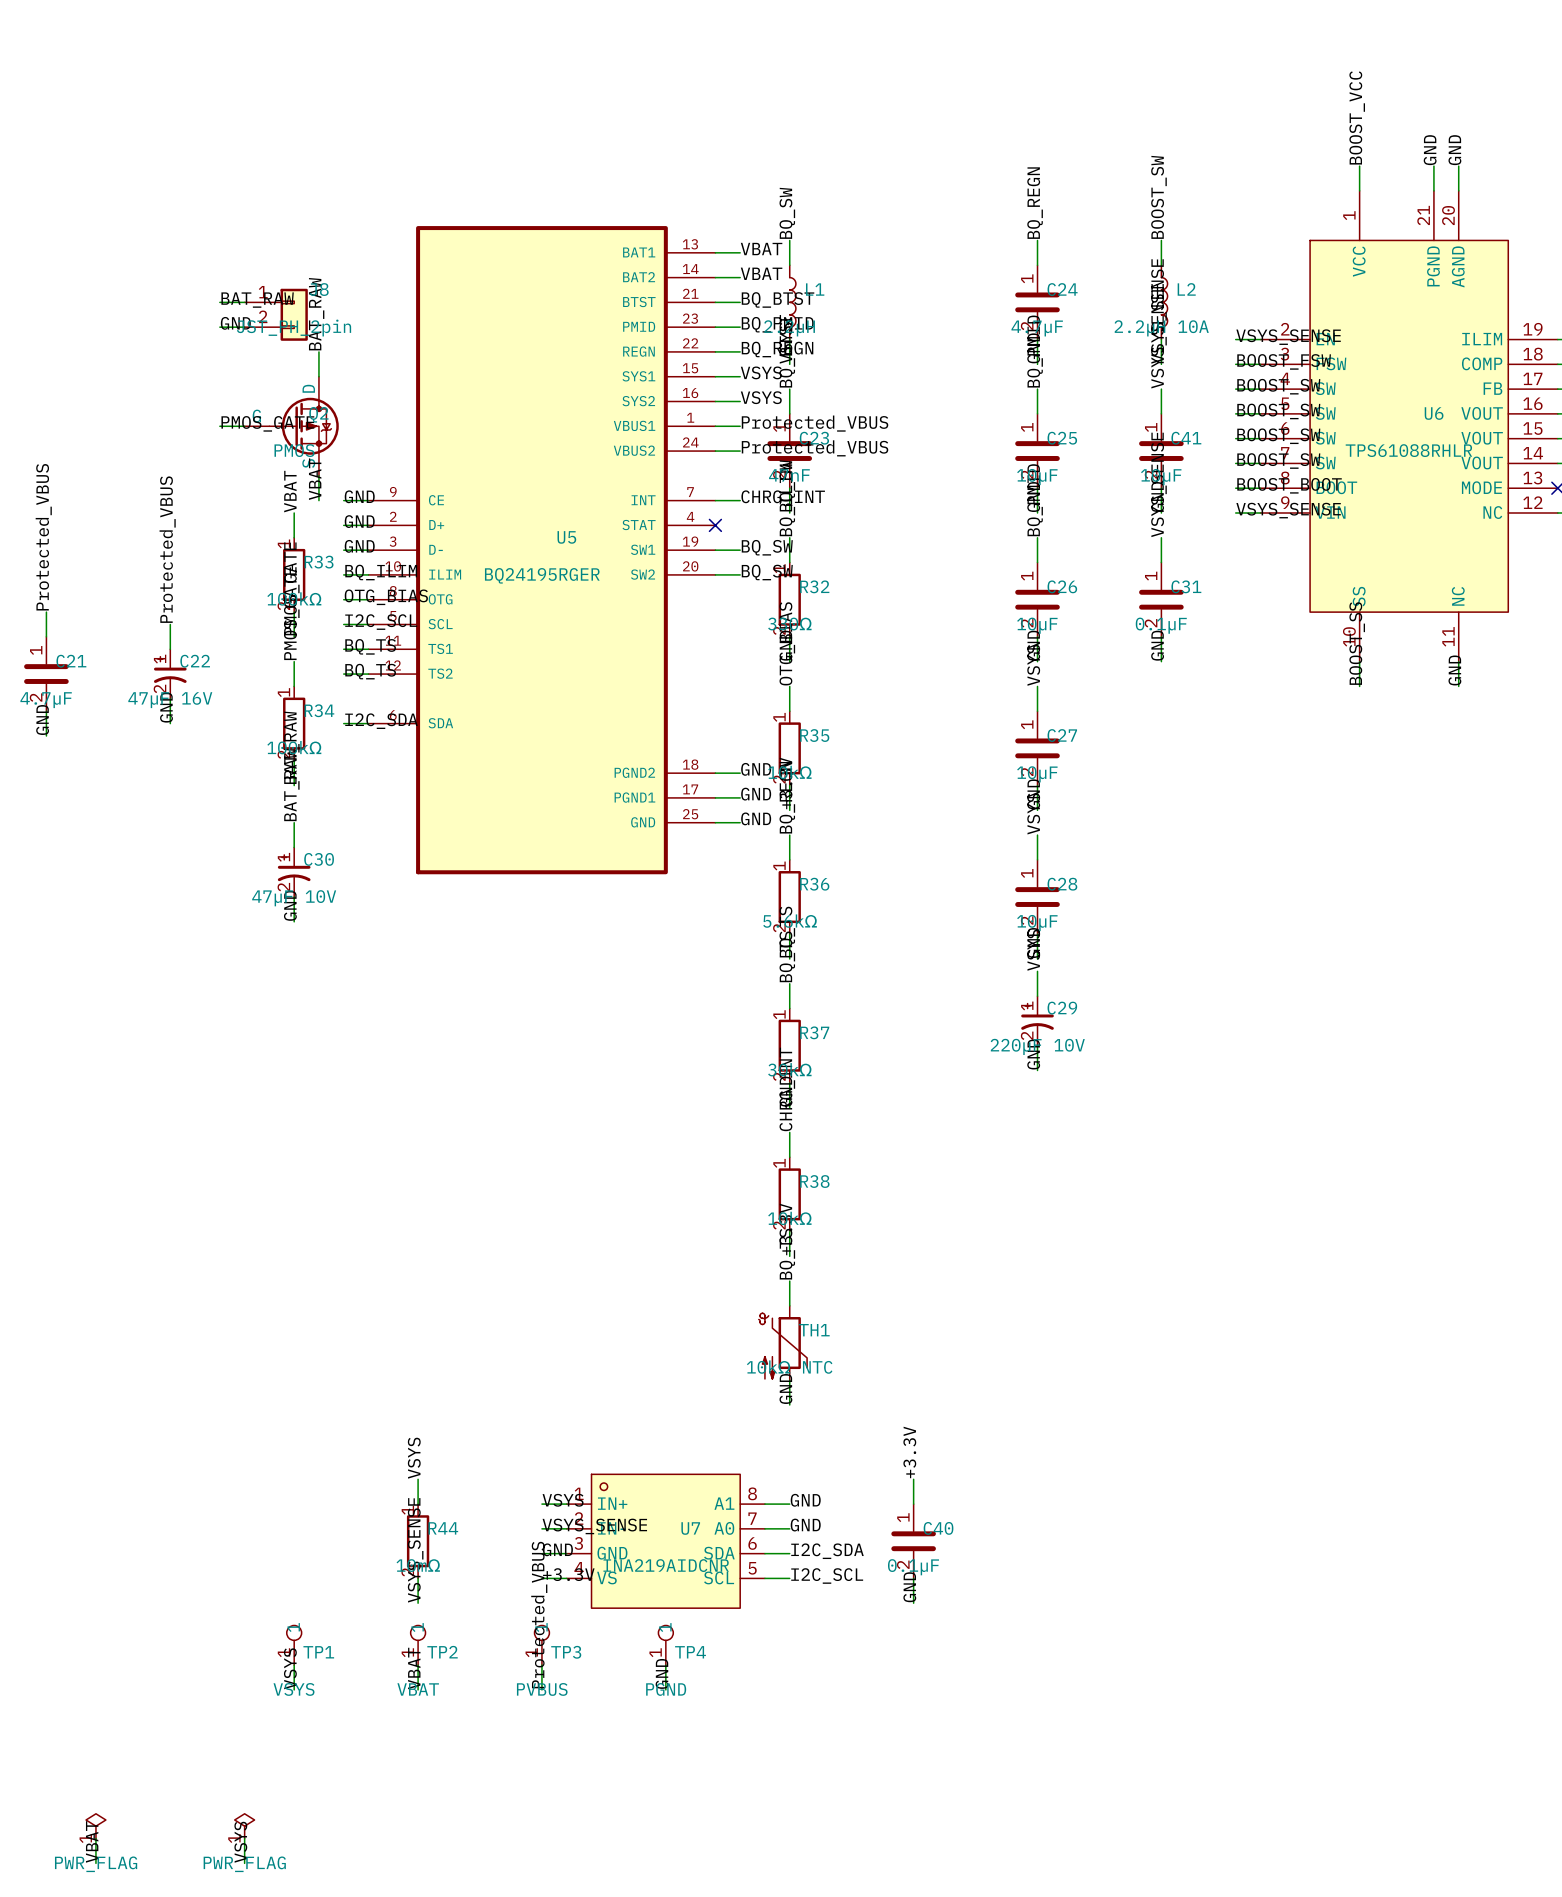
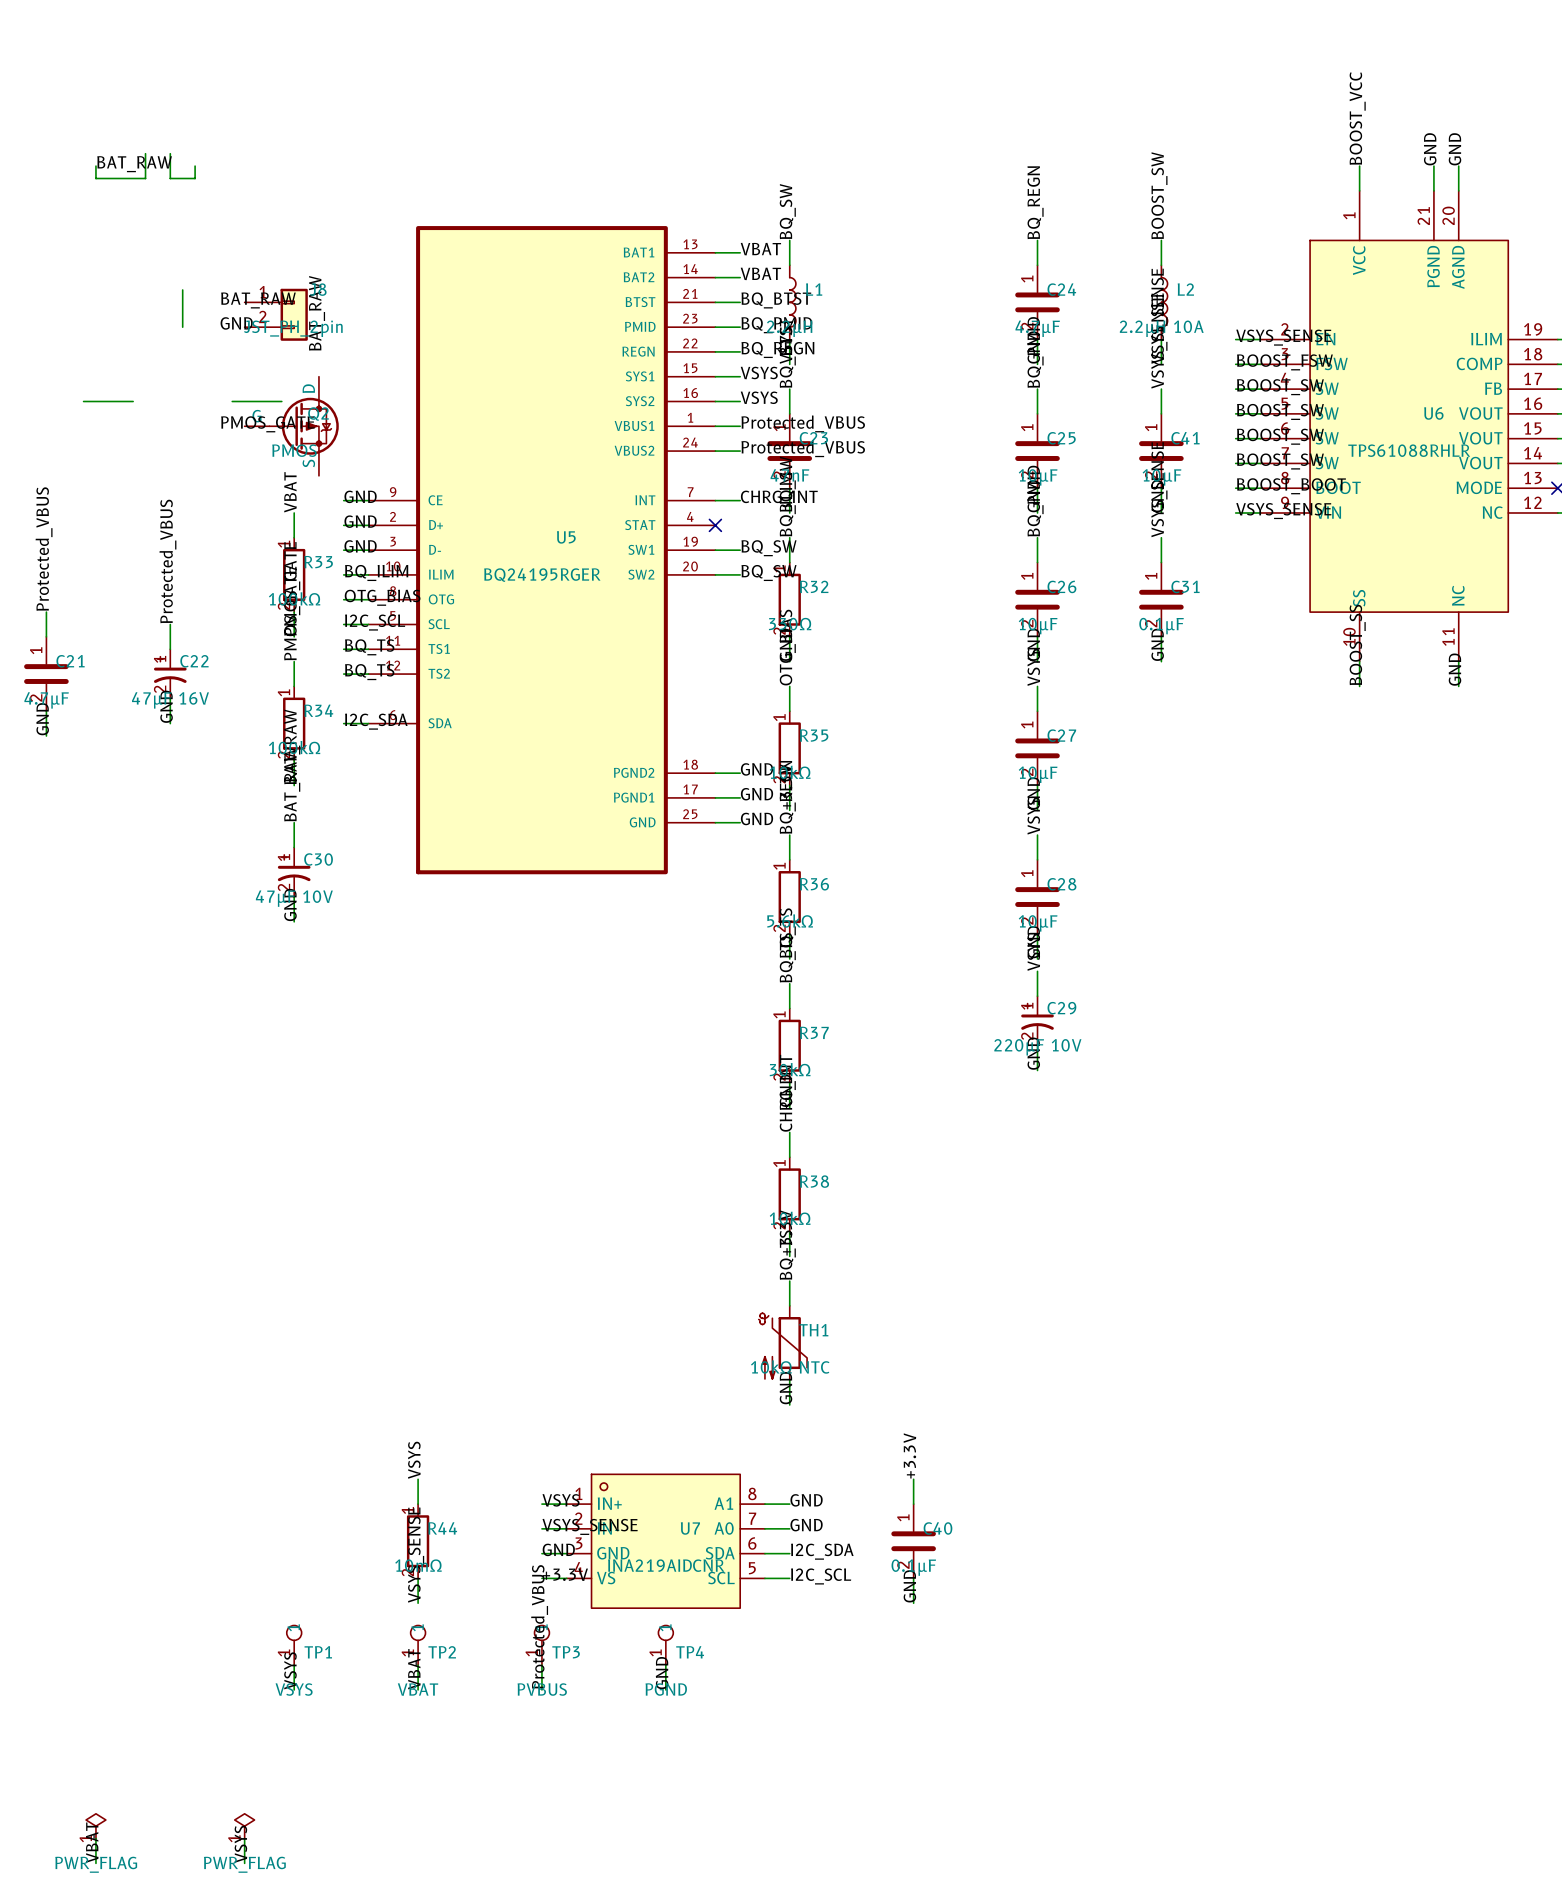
wire: none -> (145, 153) (145, 178) (95, 178) (95, 166)
wire: none -> (170, 153) (170, 178) (195, 178) (195, 166)
label: none -> BAT_RAW (134, 164)
wire: none -> (182, 290) (182, 327)
wire: (219, 302) (244, 302) -> none
wire: (219, 327) (244, 327) -> none
wire: (318, 351) (318, 376) -> none
wire: none -> (83, 401) (133, 401)
wire: none -> (232, 401) (281, 401)
wire: (219, 426) (244, 426) -> none
wire: (318, 475) (318, 500) -> none
label: VBAT (315, 479) -> none

